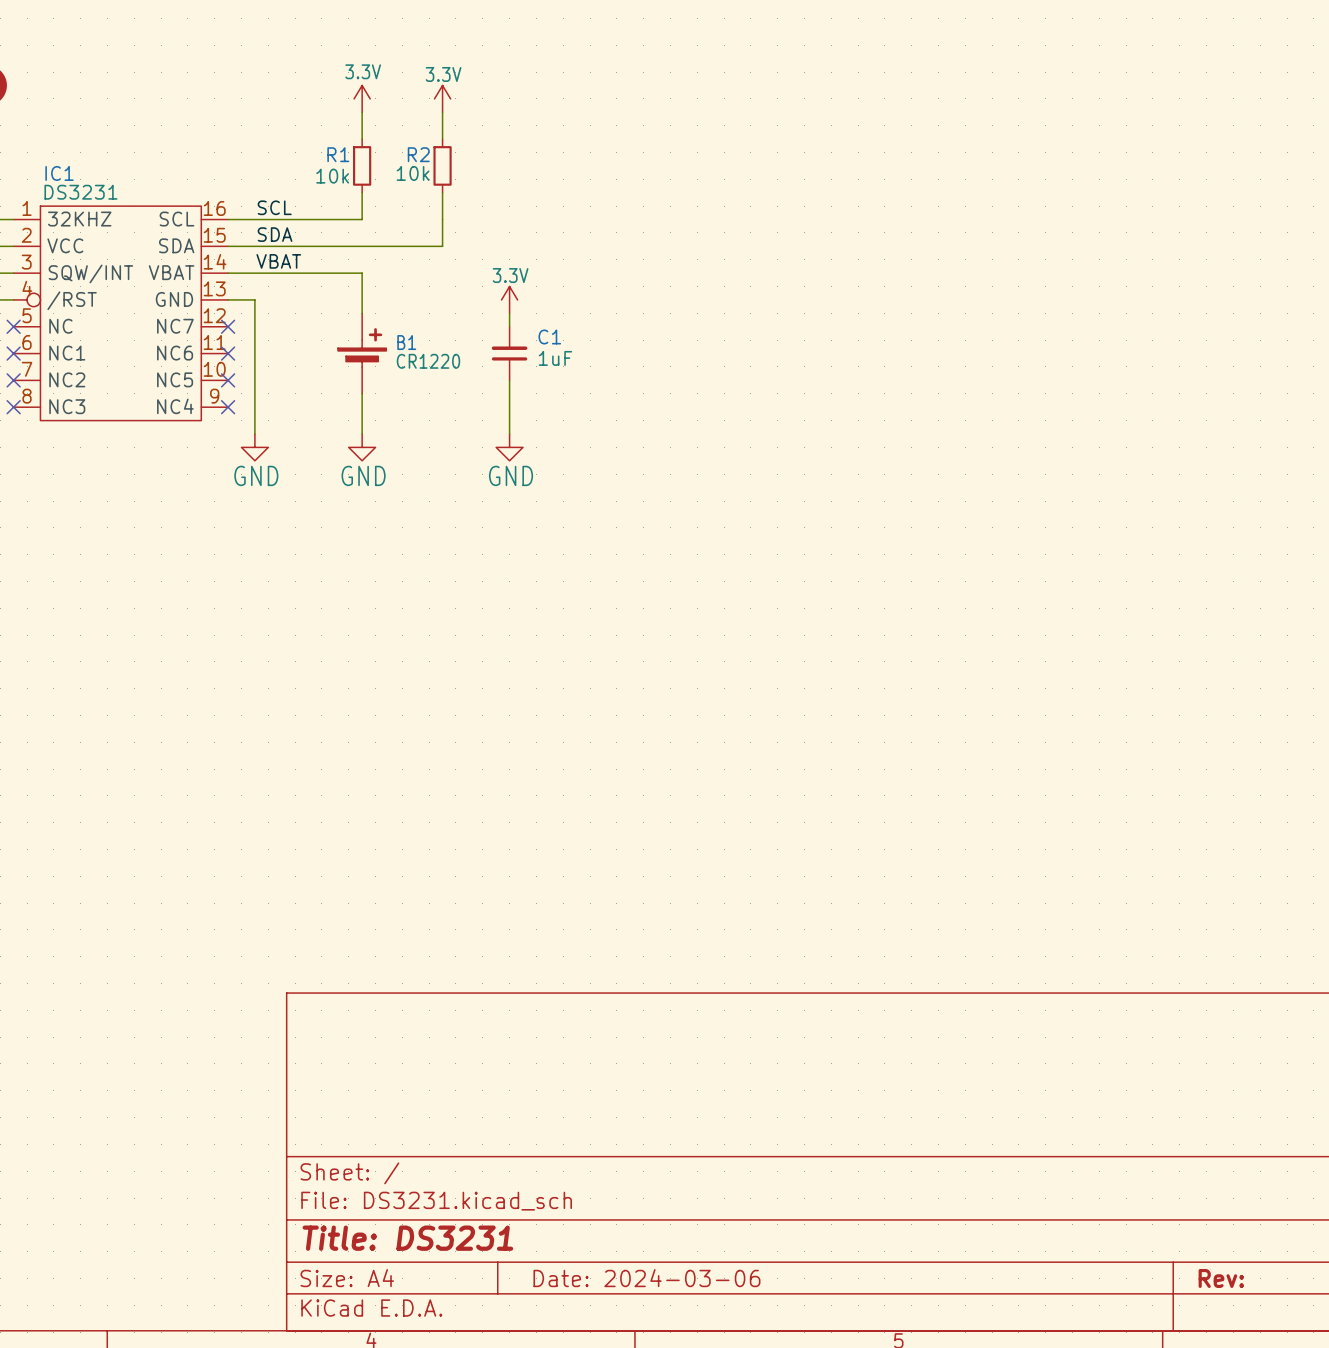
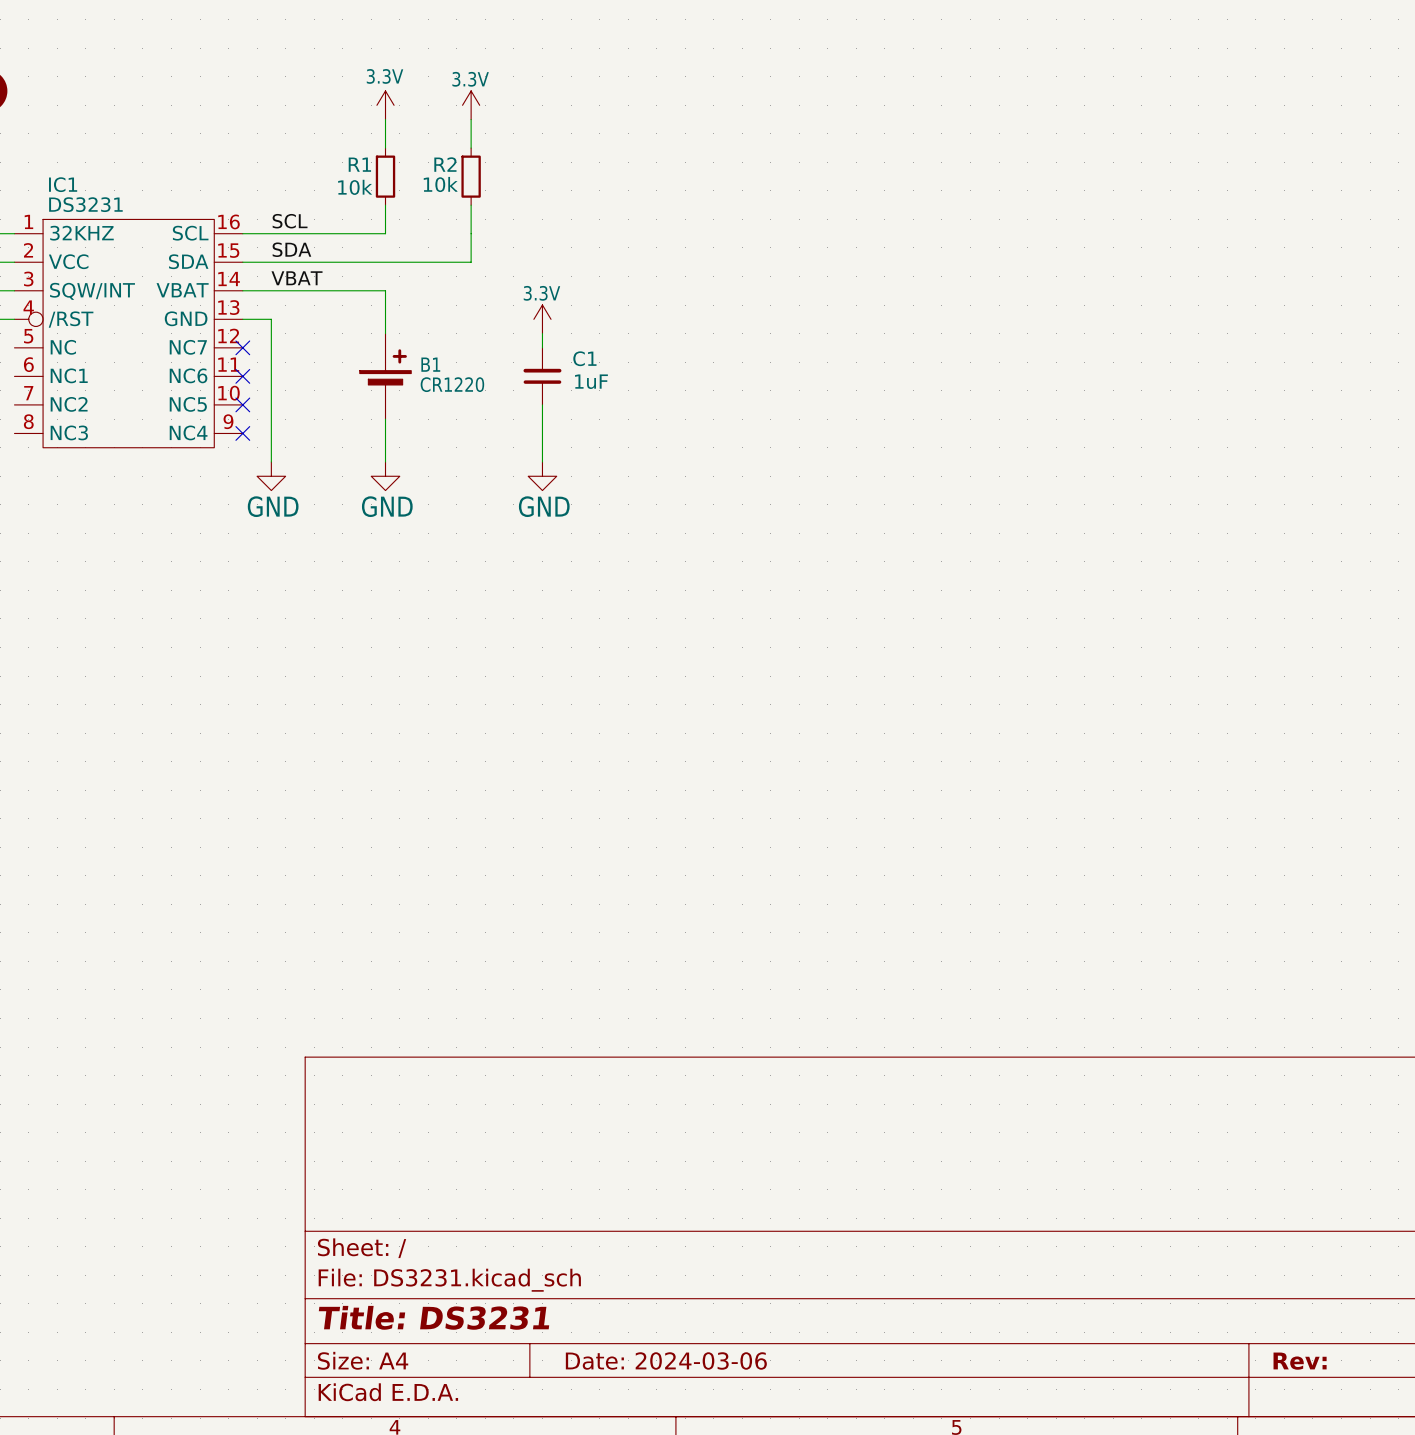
no-connect mark: (13, 326) -> none
no-connect mark: (13, 353) -> none
no-connect mark: (13, 380) -> none
no-connect mark: (13, 407) -> none

